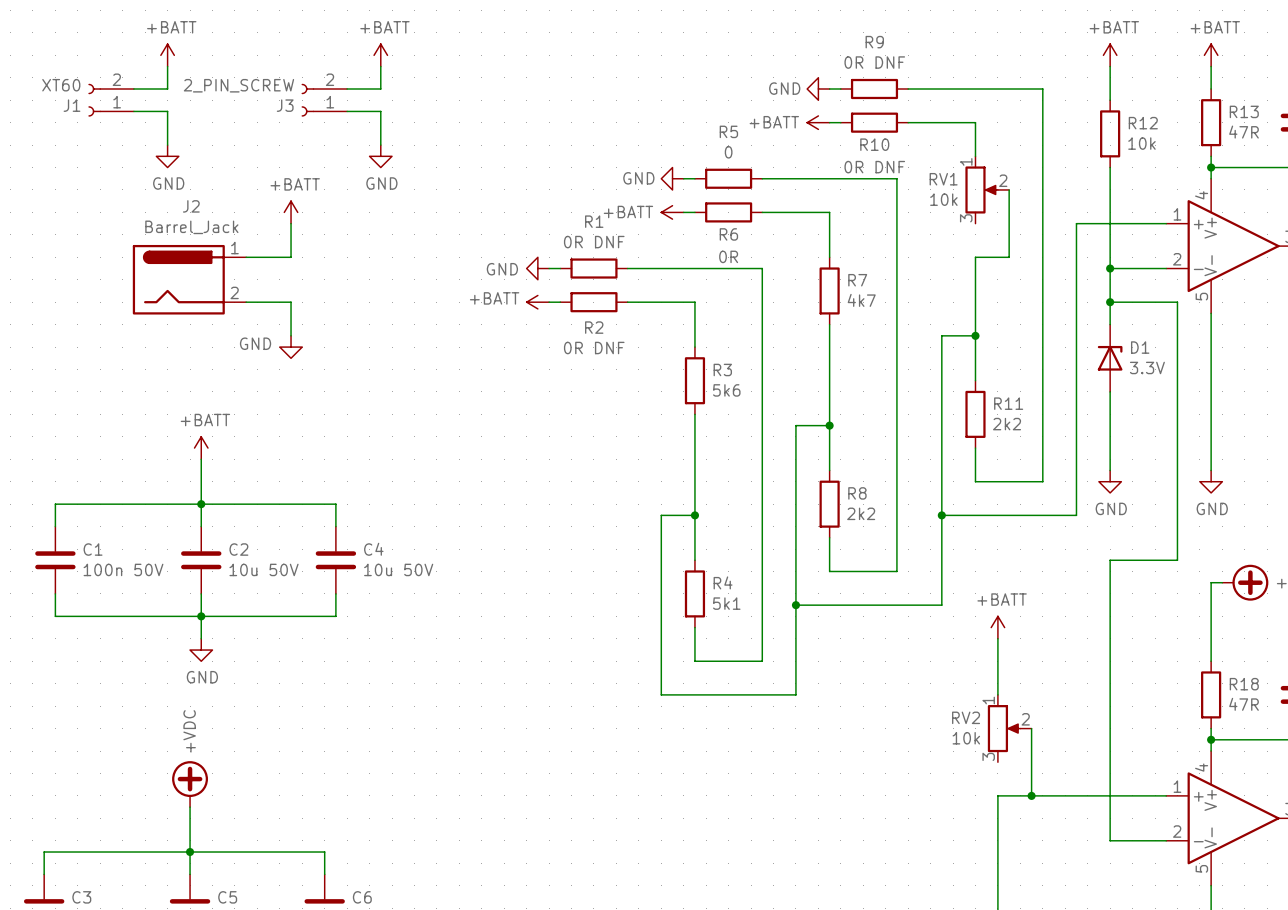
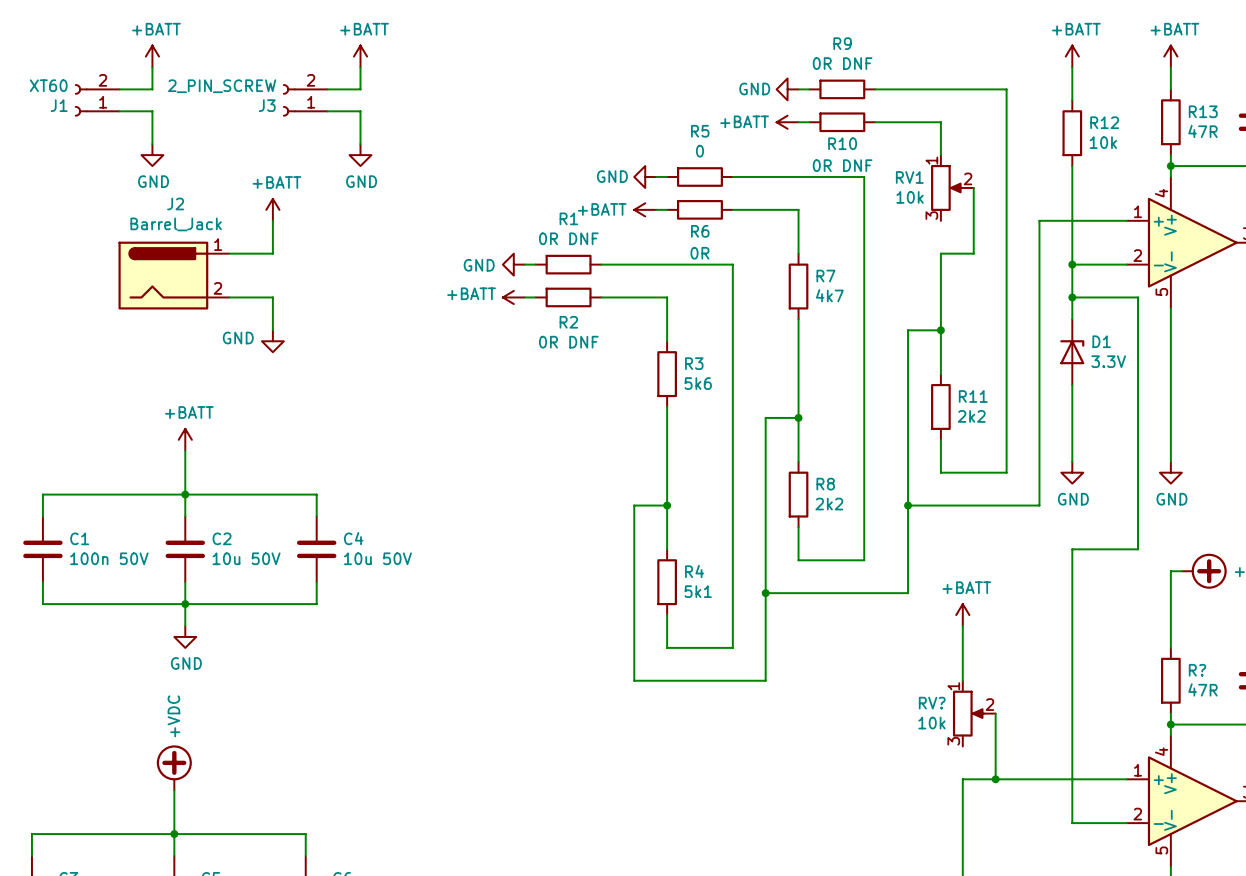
R18 name: R18 (1244, 684) -> R? (1197, 670)
RV2 name: RV2 (966, 717) -> RV? (932, 703)

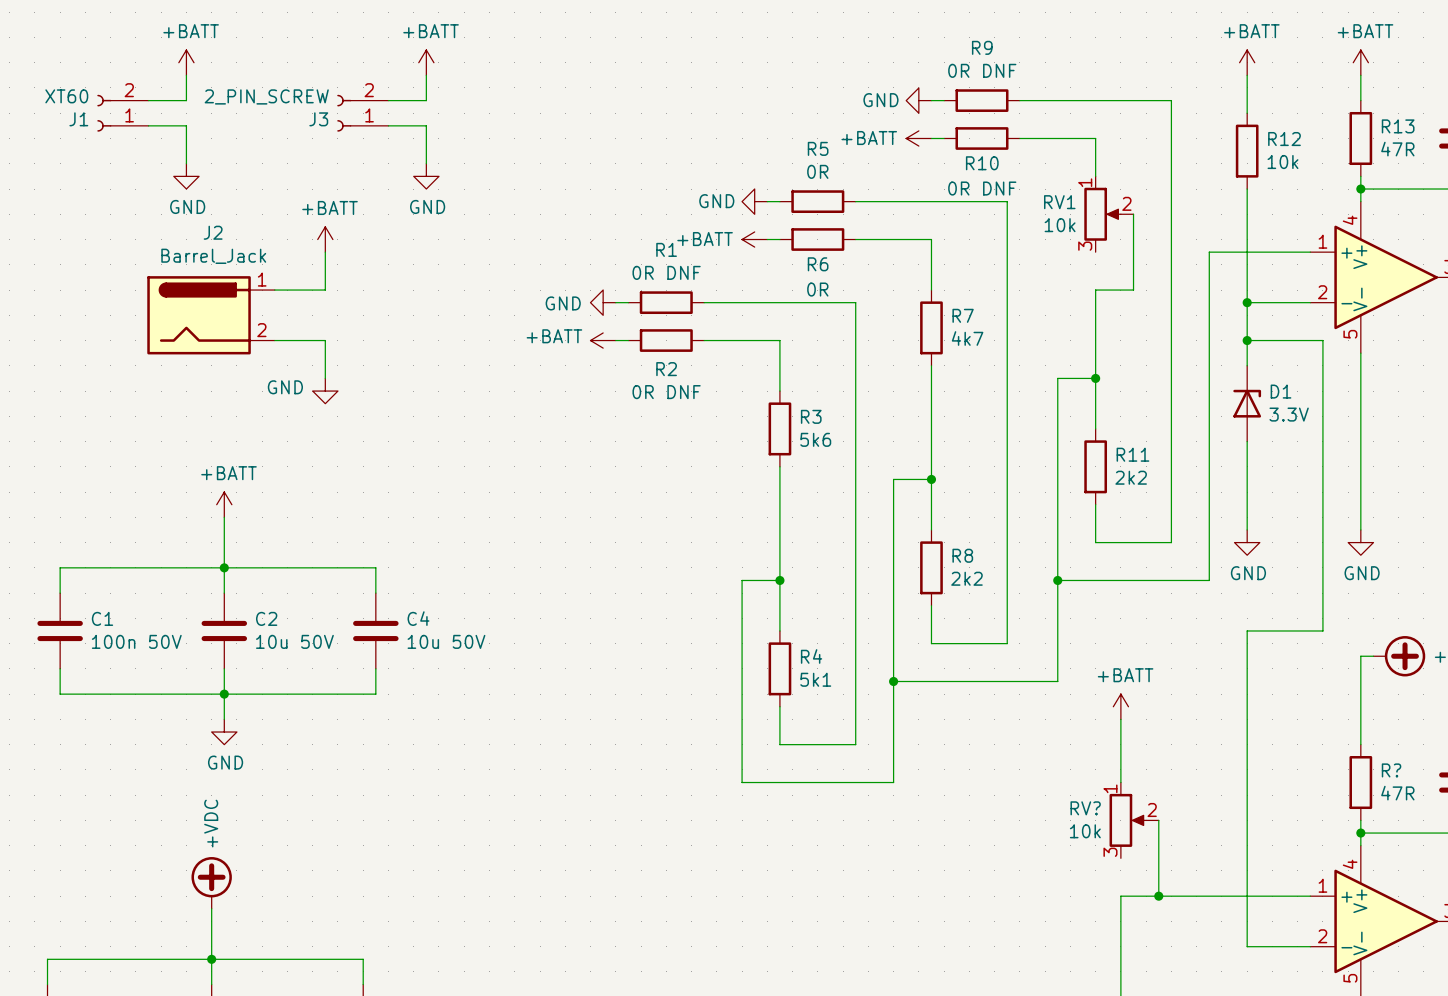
R5 value: 0 (699, 151) -> 0R (817, 171)

